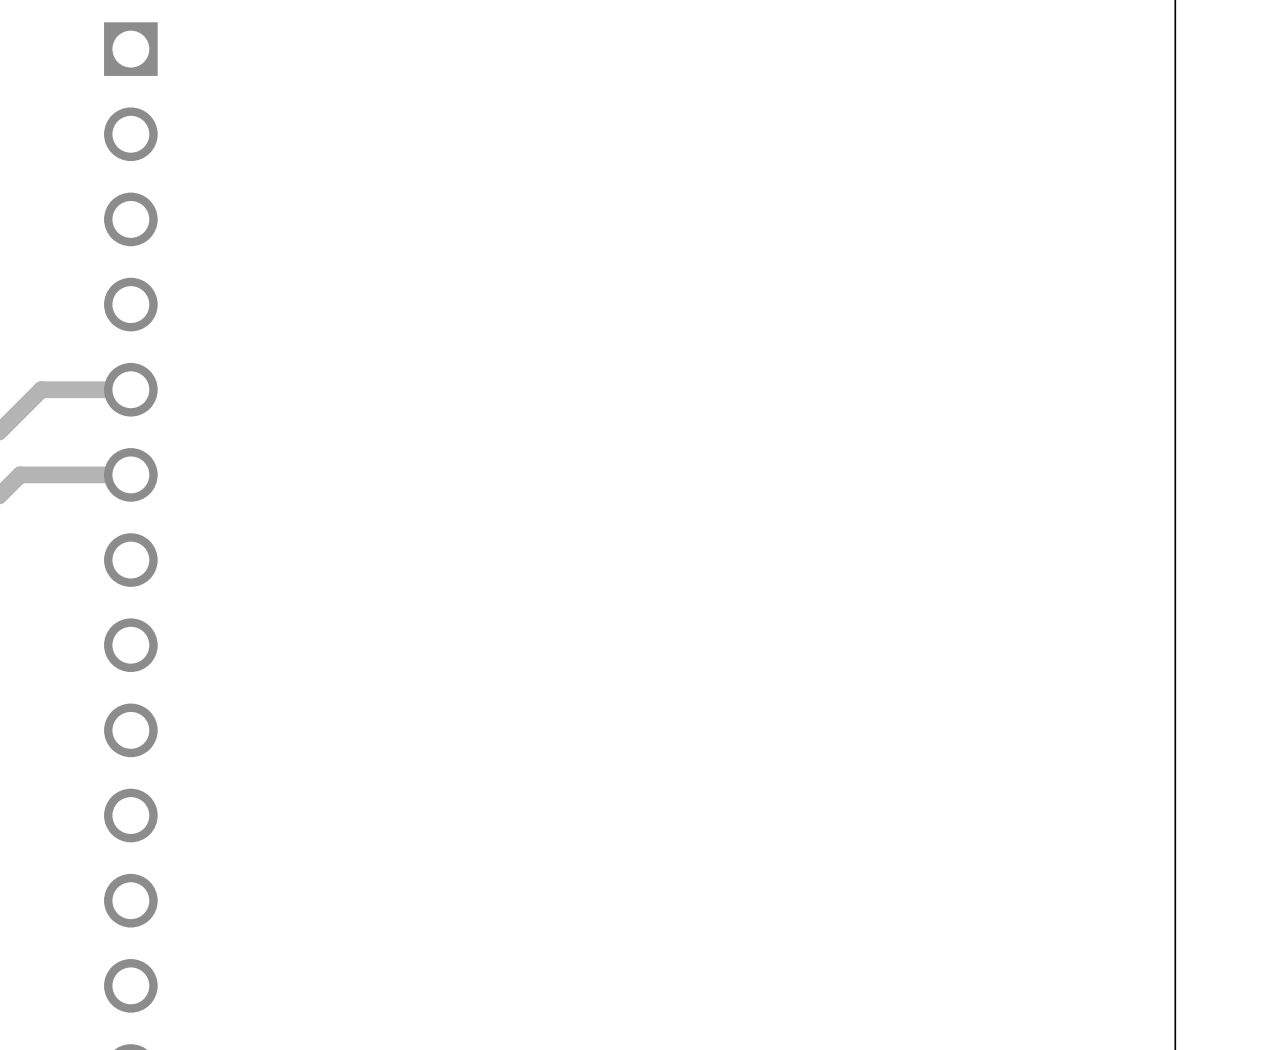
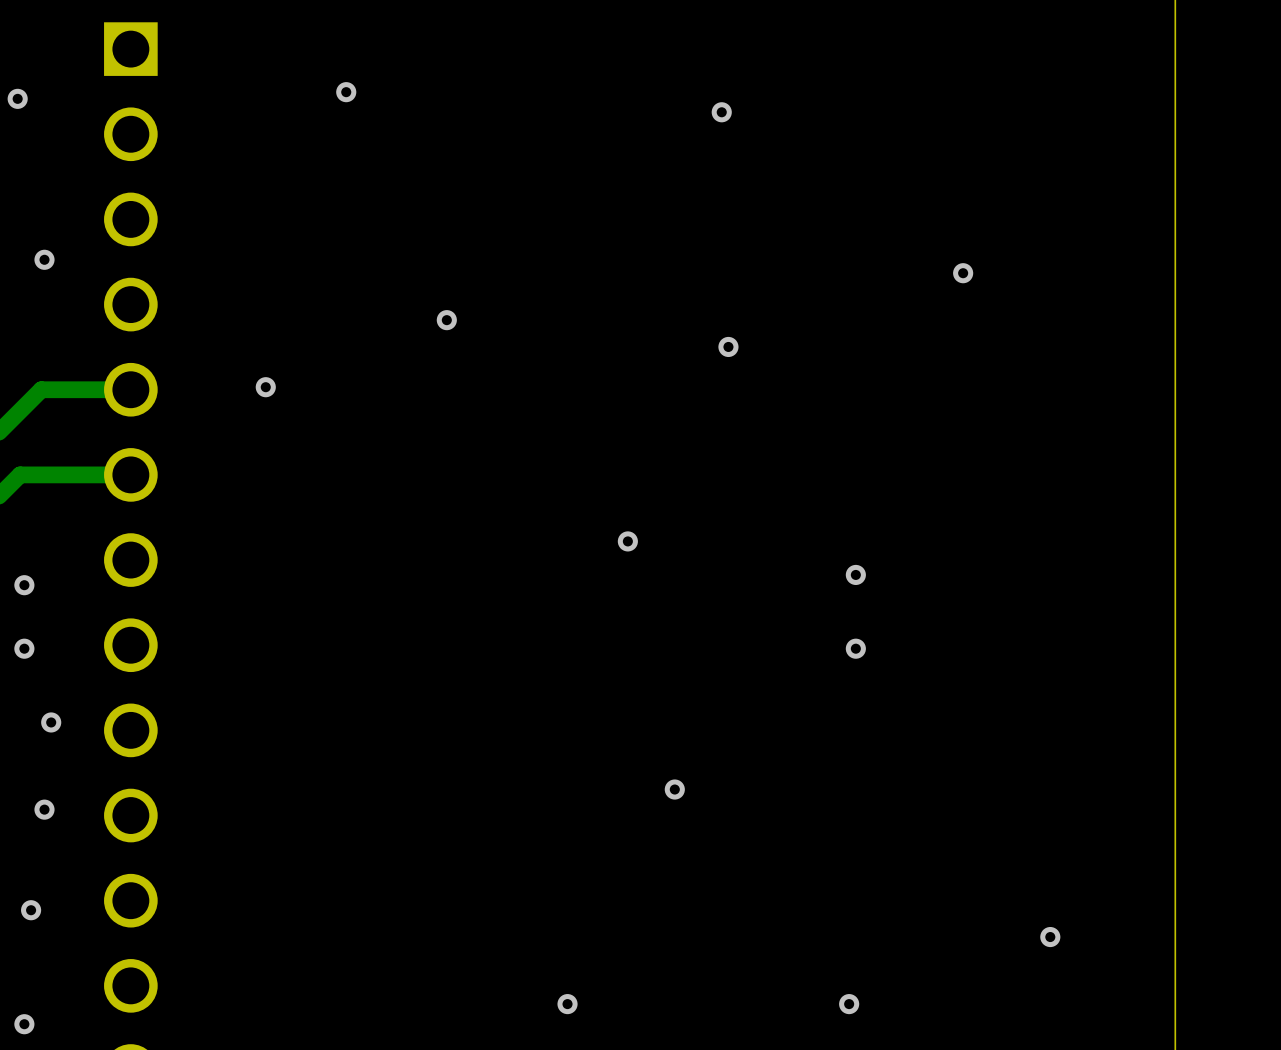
via: none -> (346, 92)
via: none -> (17, 98)
via: none -> (721, 112)
via: none -> (44, 259)
via: none -> (963, 273)
via: none -> (446, 320)
via: none -> (728, 346)
via: none -> (265, 387)
via: none -> (627, 541)
via: none -> (855, 574)
via: none -> (24, 585)
via: none -> (24, 648)
via: none -> (855, 648)
via: none -> (51, 722)
via: none -> (674, 789)
via: none -> (44, 809)
via: none -> (31, 910)
via: none -> (1050, 937)
via: none -> (567, 1004)
via: none -> (849, 1004)
via: none -> (24, 1024)

